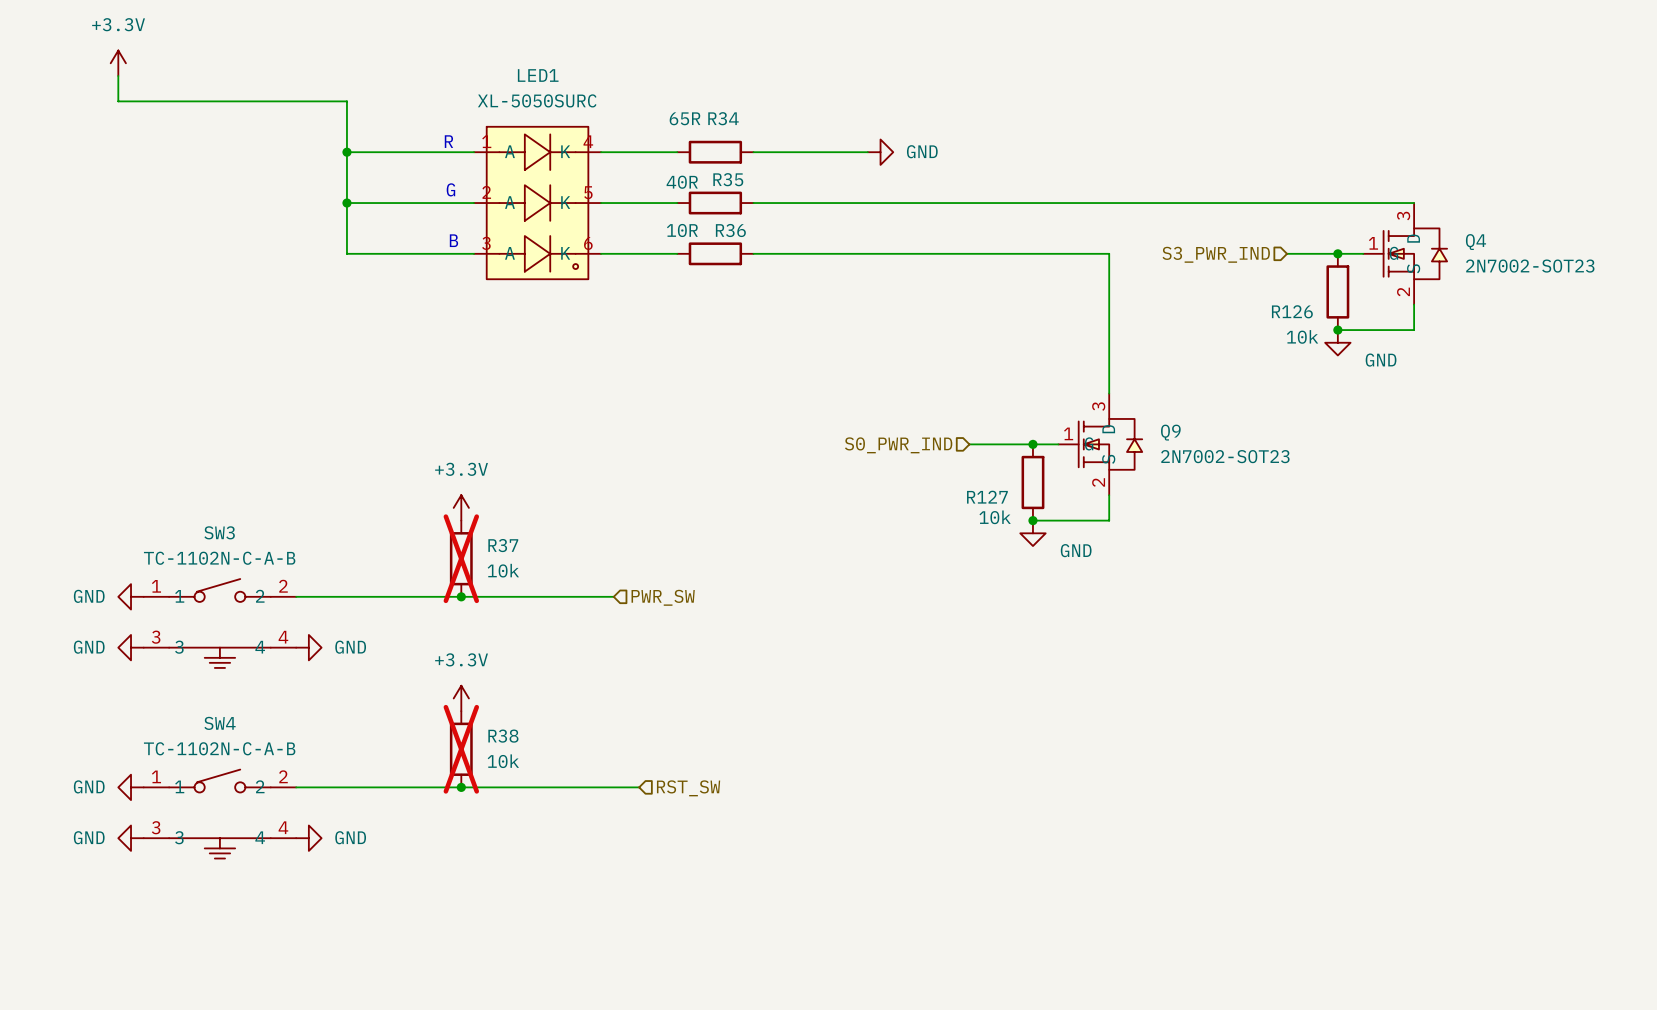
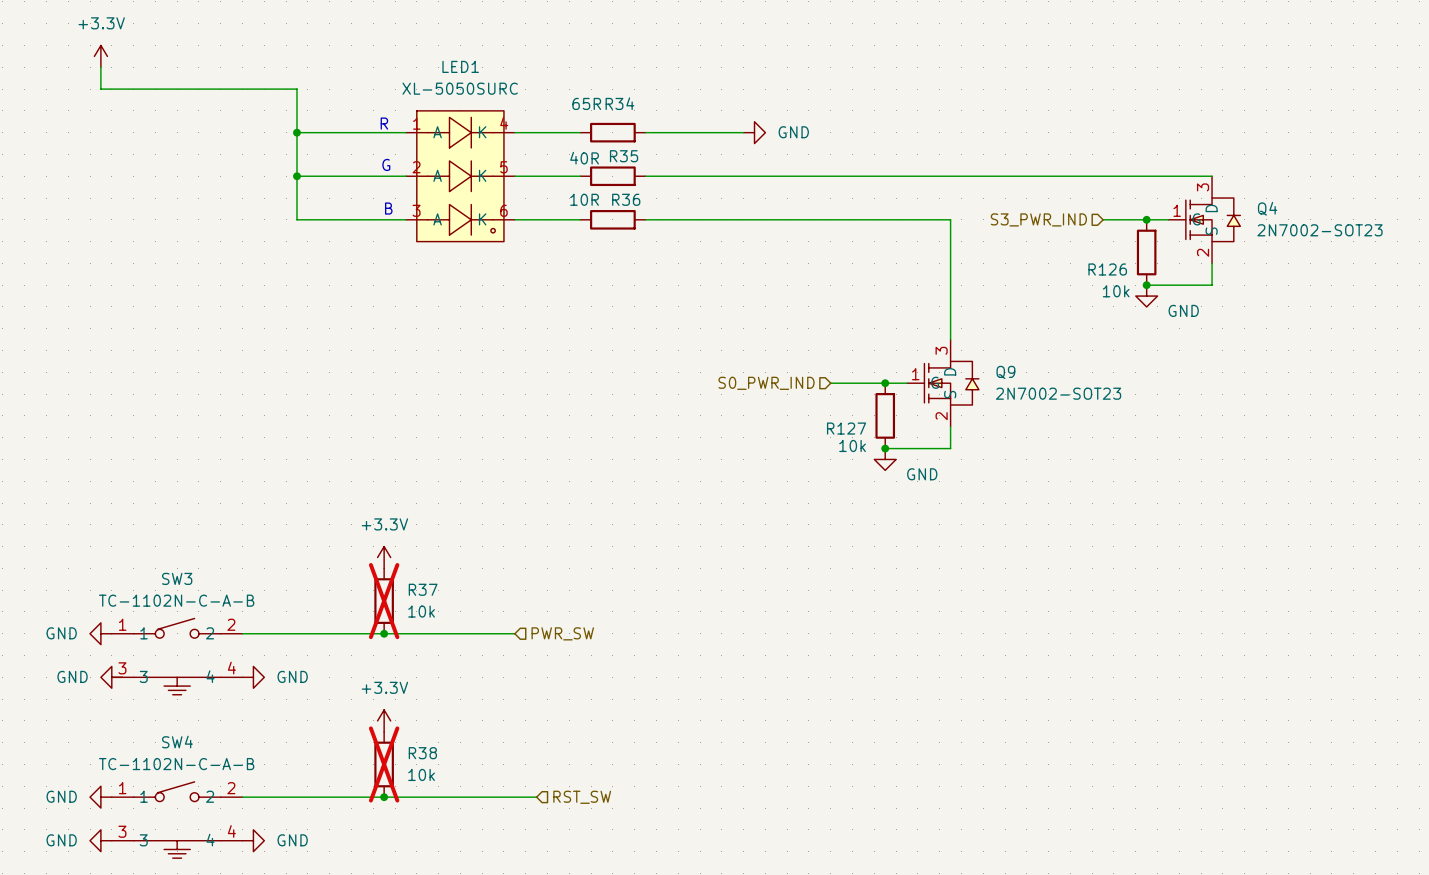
power symbol: +3.3V (461, 507) -> none
R37 position: (461, 558) -> (384, 601)
power symbol: GND (131, 596) -> none
wire: (296, 596) (613, 596) -> (242, 633) (514, 633)
junction: (461, 596) -> none
hierarchical label position: PWR_SW (663, 597) -> PWR_SW (562, 633)
SW3 position: (219, 623) -> (177, 656)
power symbol: GND (131, 647) -> none
power symbol: GND (308, 647) -> none
power symbol position: +3.3V (461, 698) -> +3.3V (384, 557)
power symbol: none -> GND (100, 633)
R38 position: (461, 749) -> (384, 764)
wire: (296, 787) (639, 787) -> (242, 797) (536, 797)
junction position: (461, 787) -> (384, 633)
hierarchical label position: RST_SW (688, 788) -> RST_SW (582, 797)
SW4 position: (219, 814) -> (177, 820)
power symbol: GND (131, 838) -> none
power symbol position: GND (308, 838) -> GND (253, 677)
power symbol: none -> +3.3V (384, 720)
power symbol: none -> GND (100, 797)
junction: none -> (384, 797)
power symbol: none -> GND (100, 840)
power symbol: none -> GND (253, 840)

